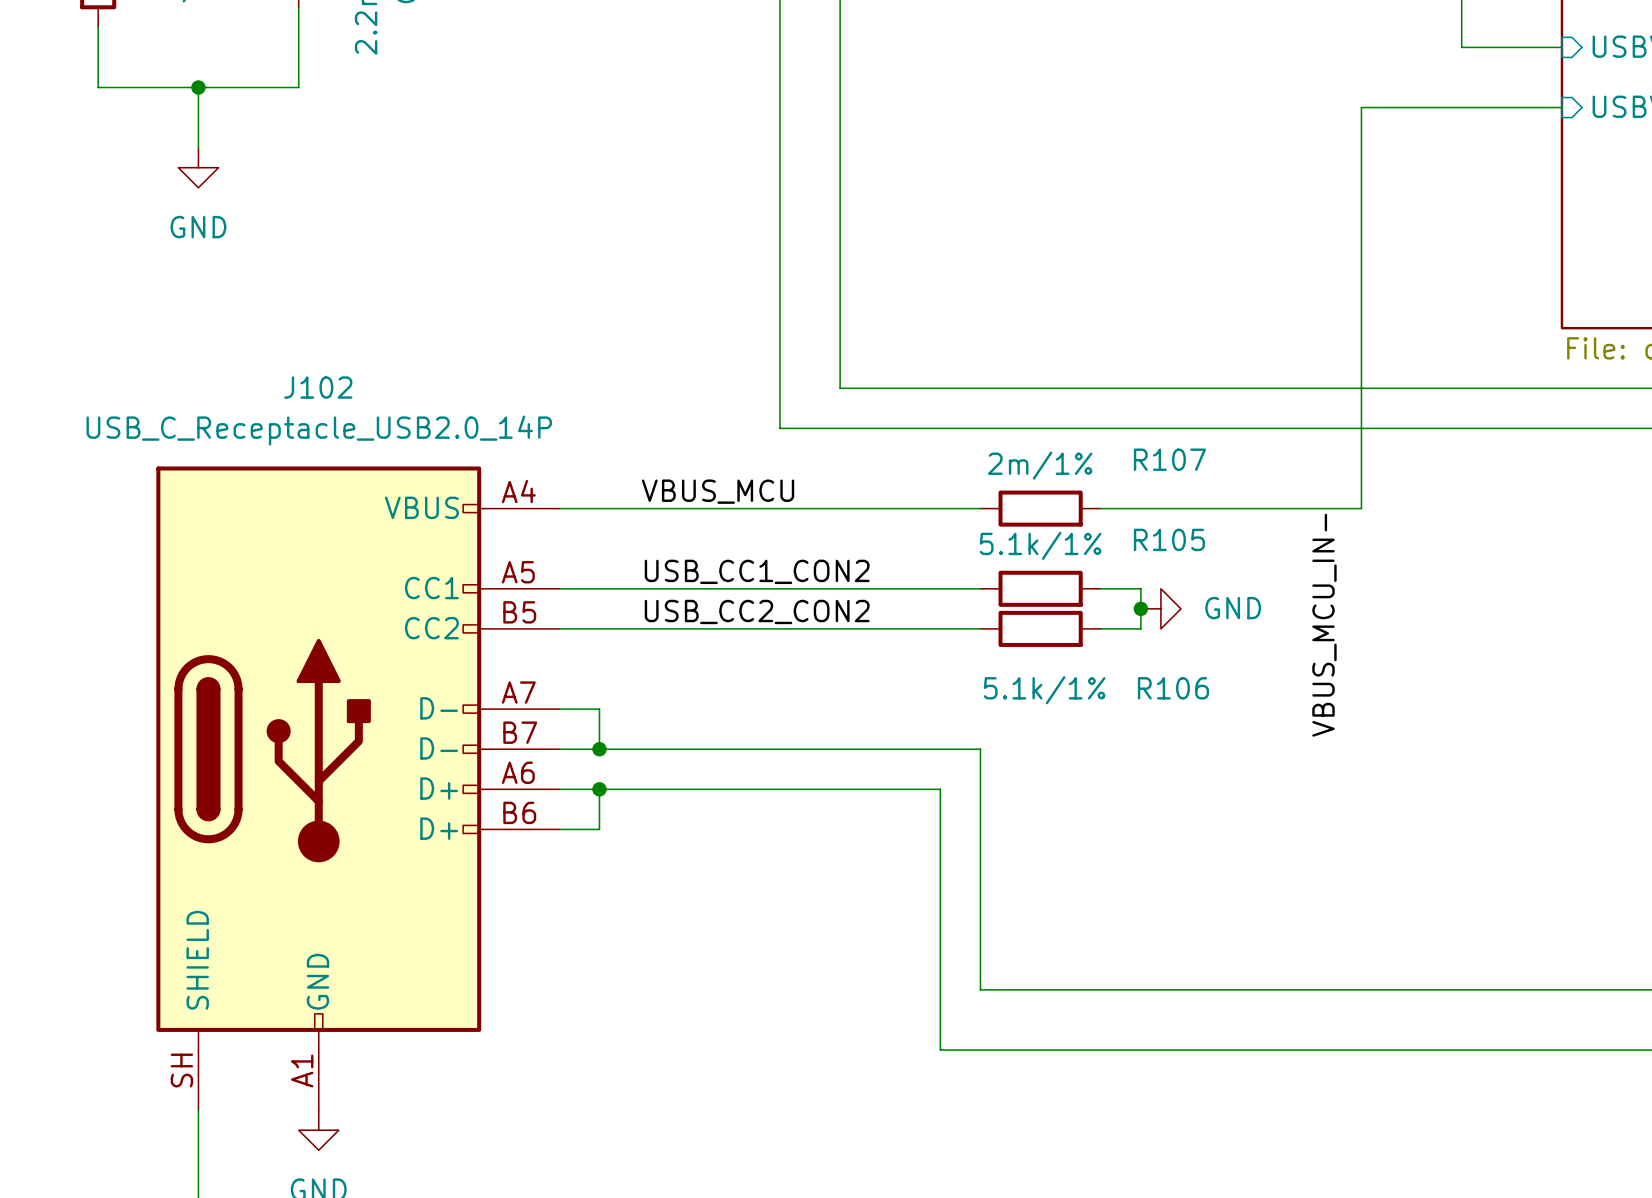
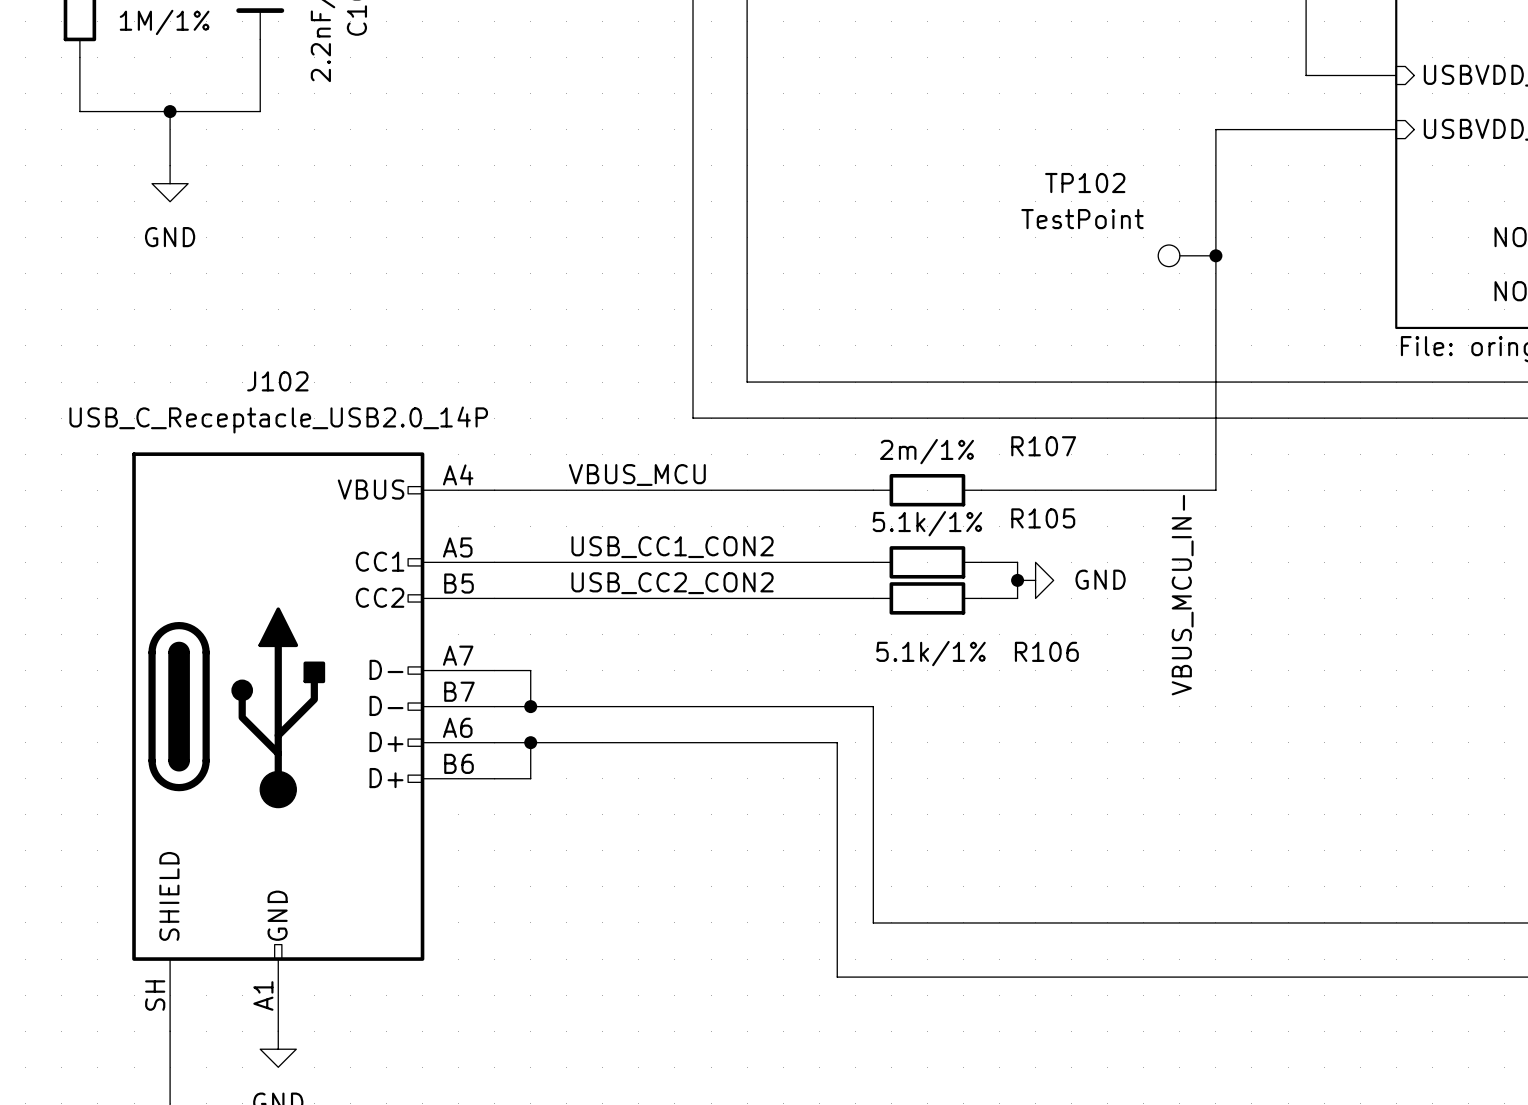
TP102: none -> TestPoint (1187, 255)
junction: none -> (1215, 255)

